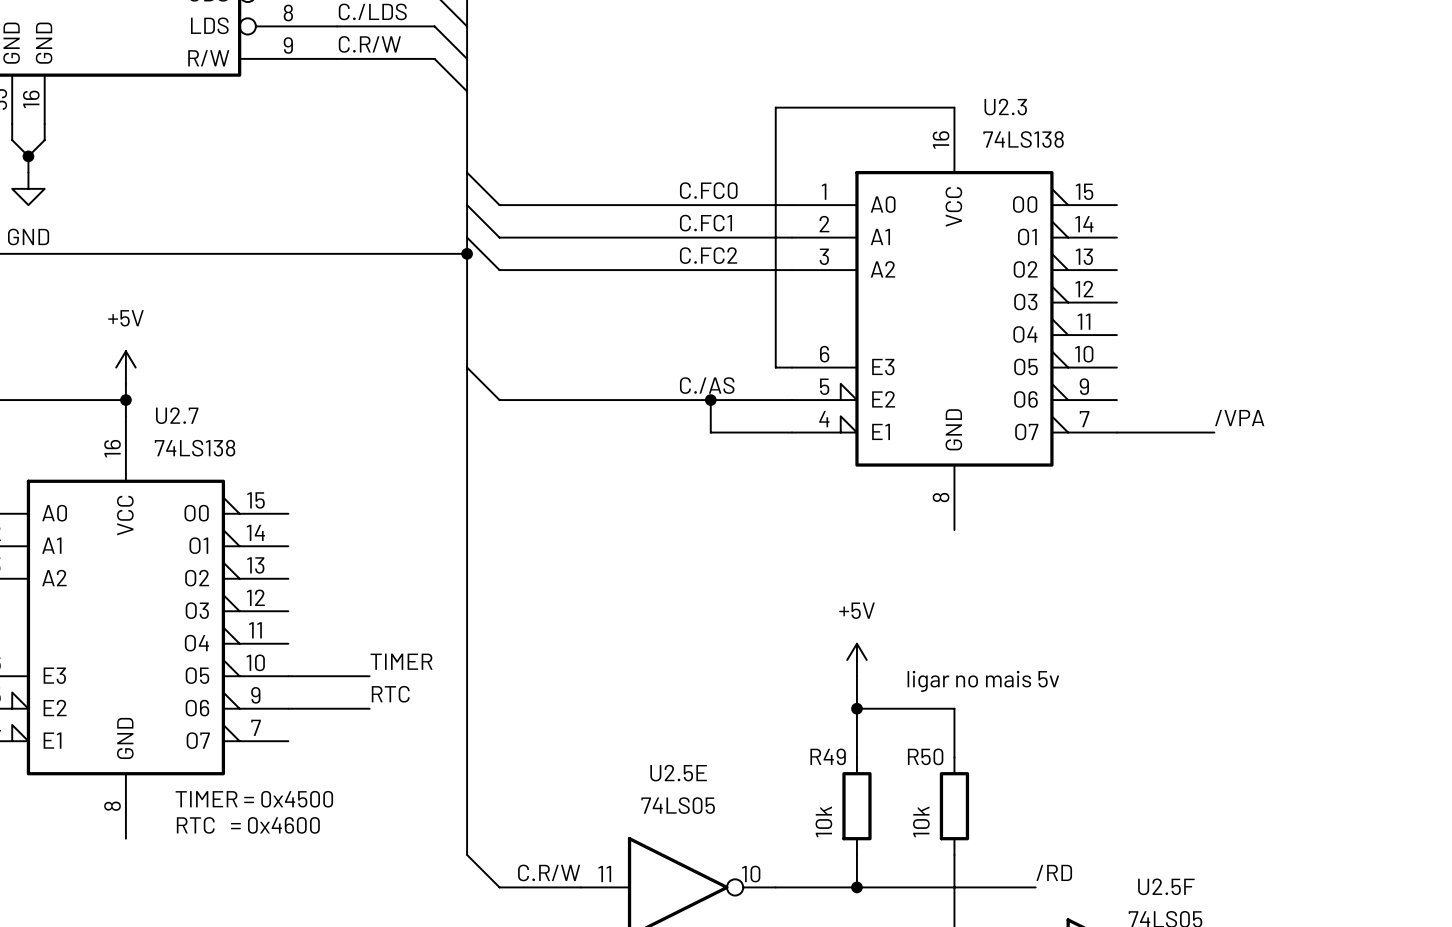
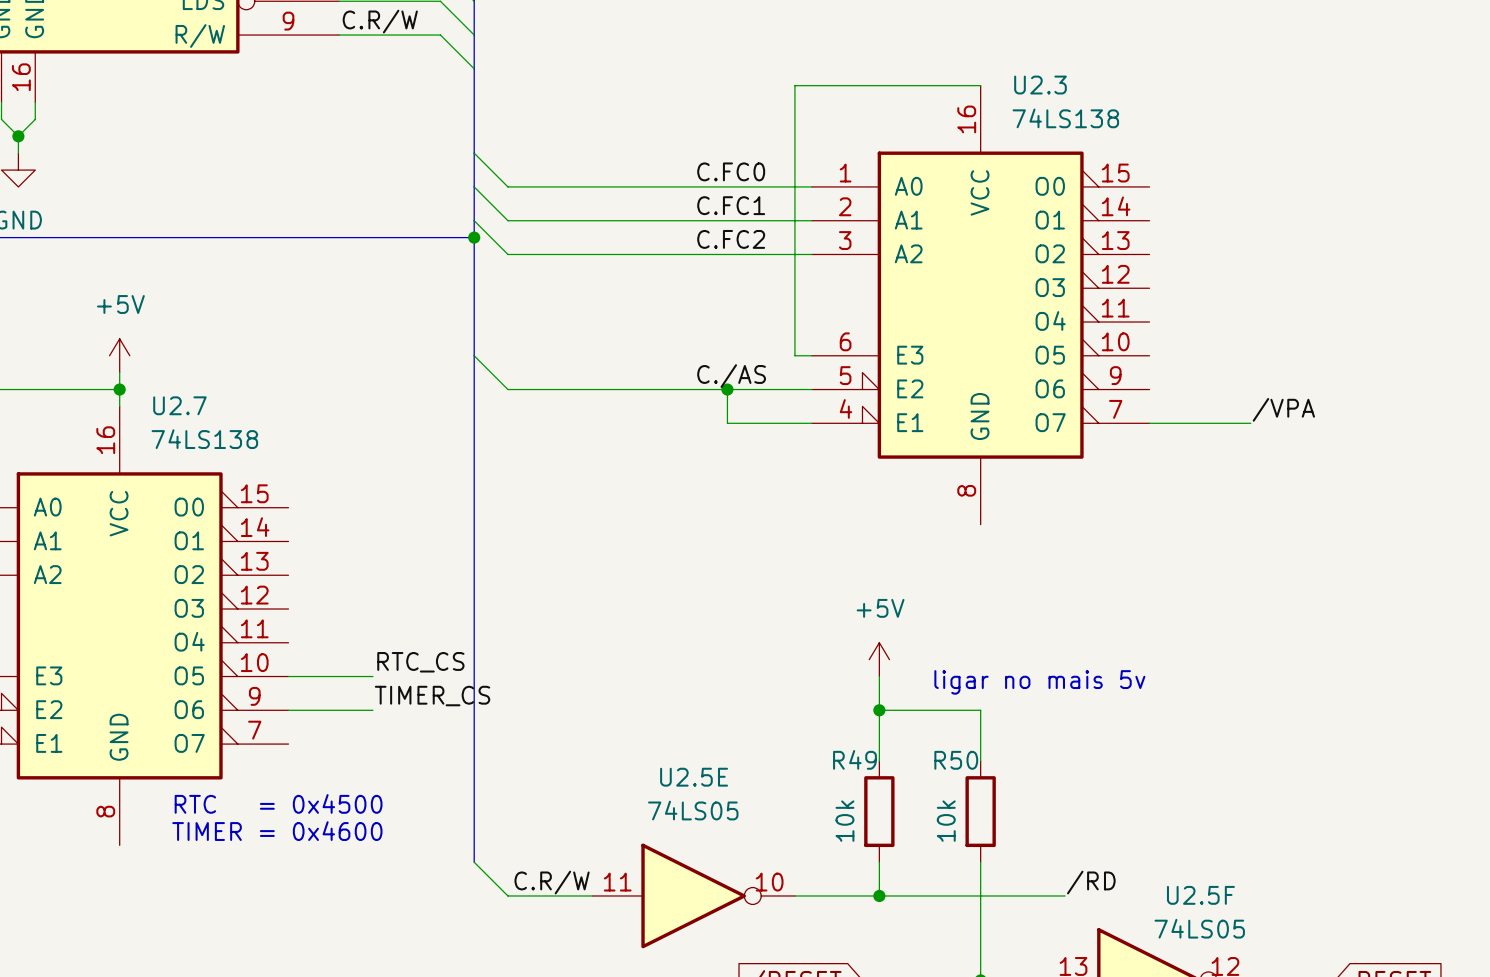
label: TIMER (401, 661) -> RTC_CS (420, 662)
label: RTC (390, 694) -> TIMER_CS (432, 696)
text: TIMER = 0x4500 (254, 799) -> RTC = 0x4500 (278, 803)
text: RTC = 0x4600 (248, 825) -> TIMER = 0x4600 (277, 831)

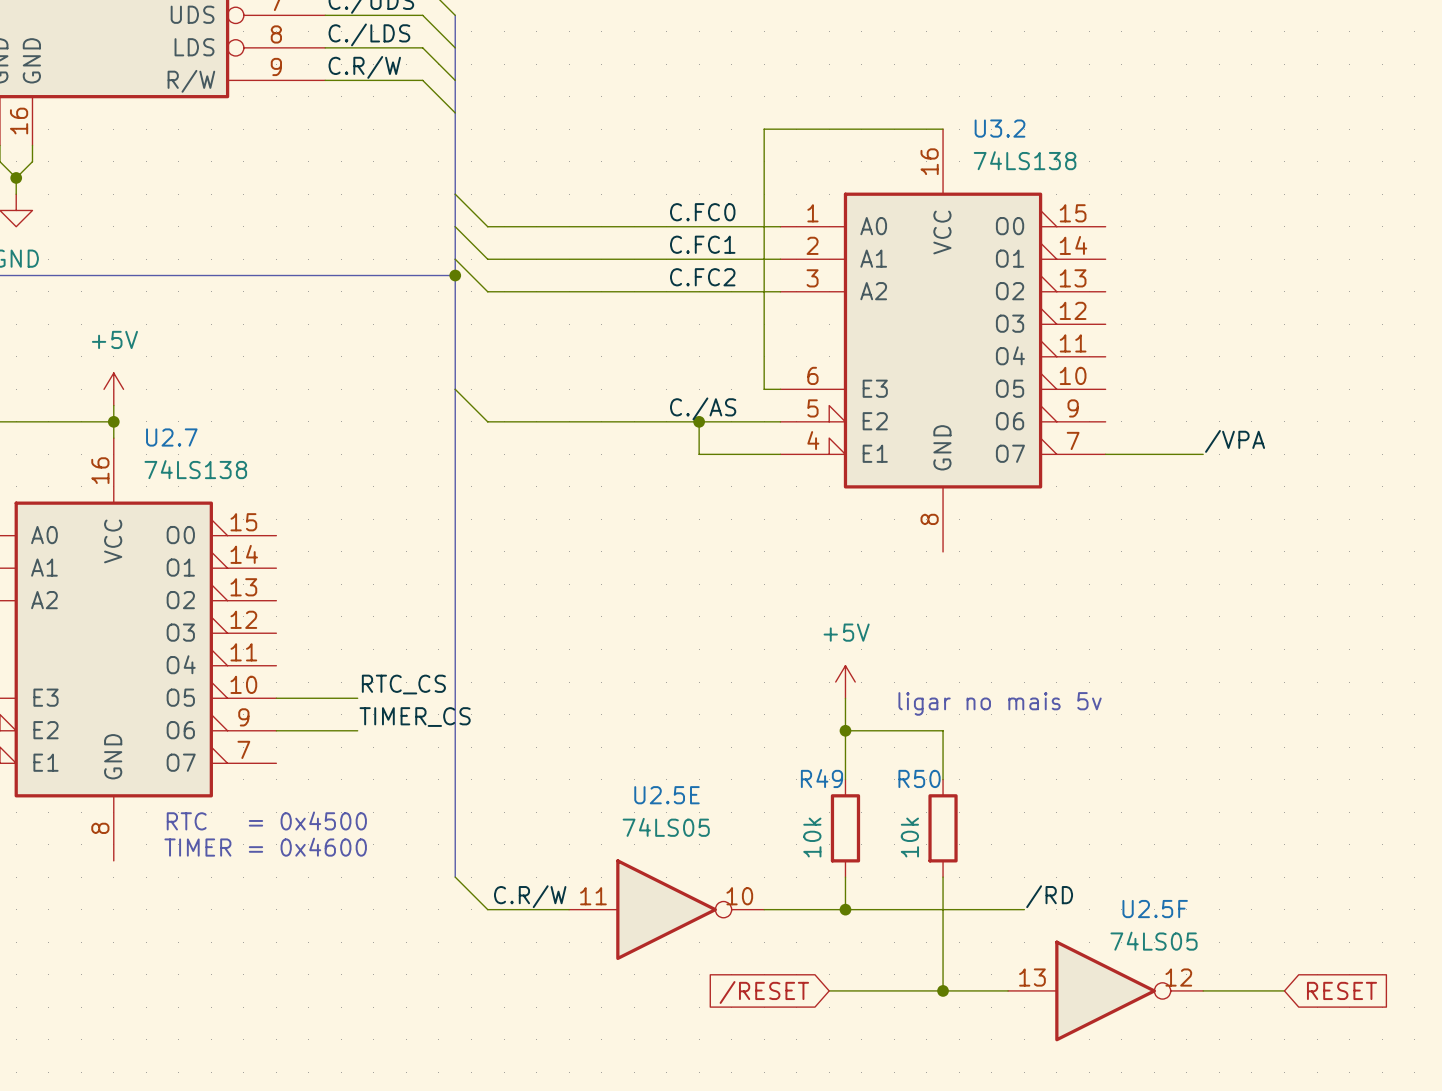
U2.3 name: U2.3 (1040, 85) -> U3.2 (1000, 128)

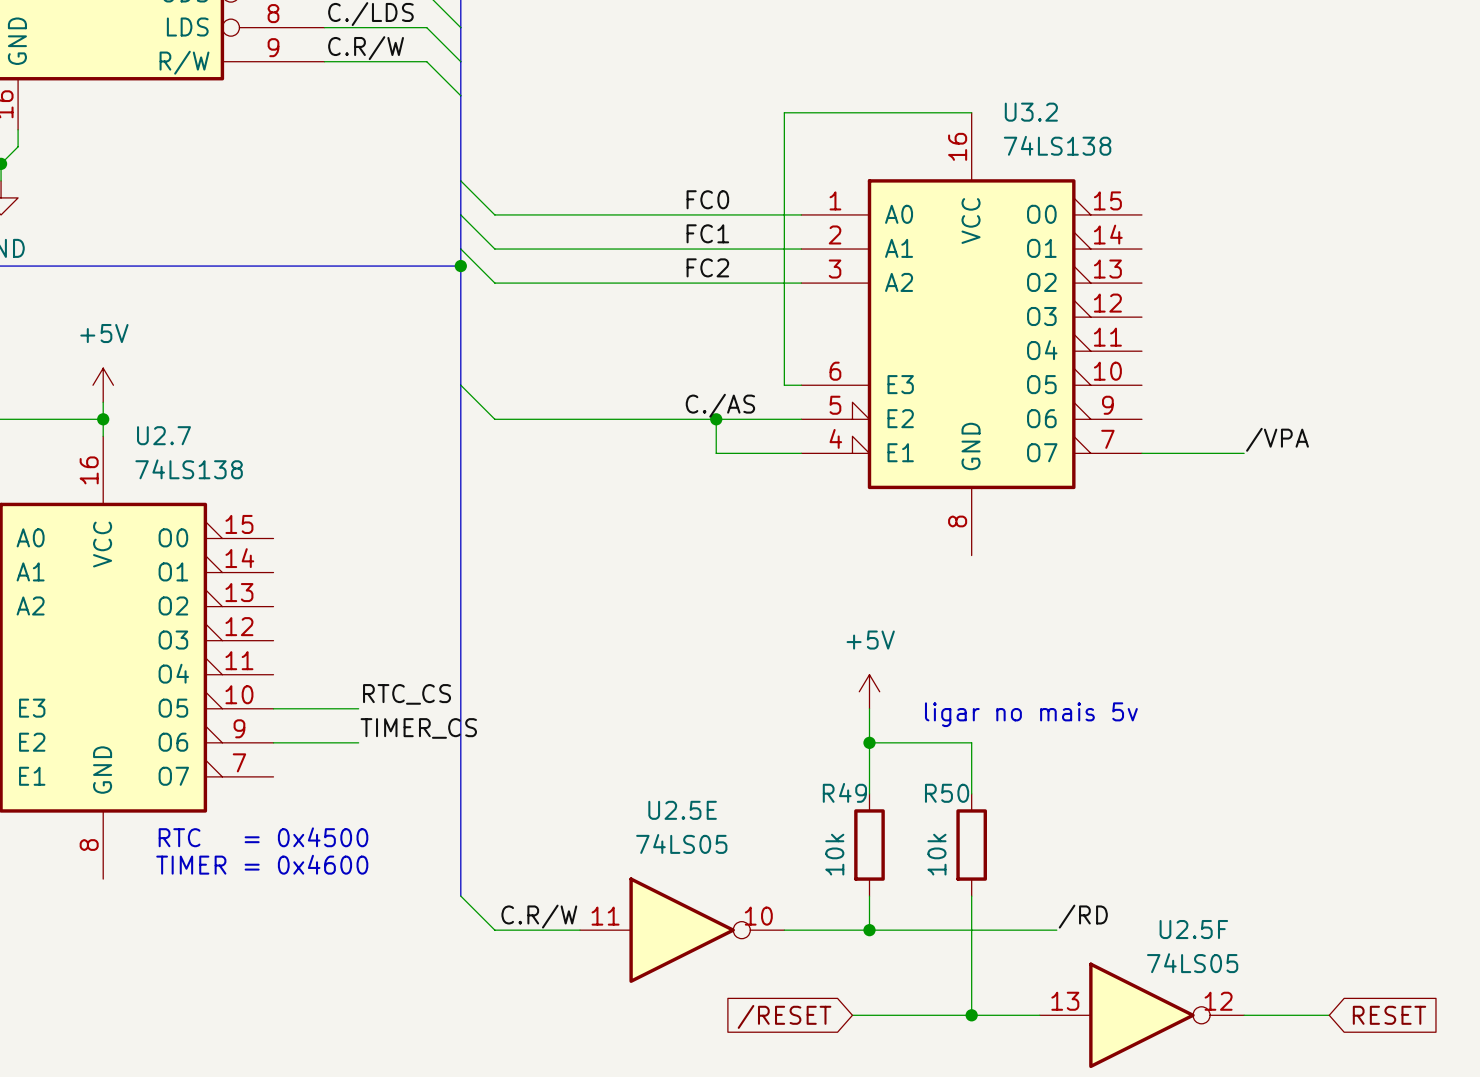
label: C.FC0 (702, 212) -> FC0 (707, 199)
label: C.FC1 (702, 244) -> FC1 (707, 233)
label: C.FC2 (702, 277) -> FC2 (707, 267)

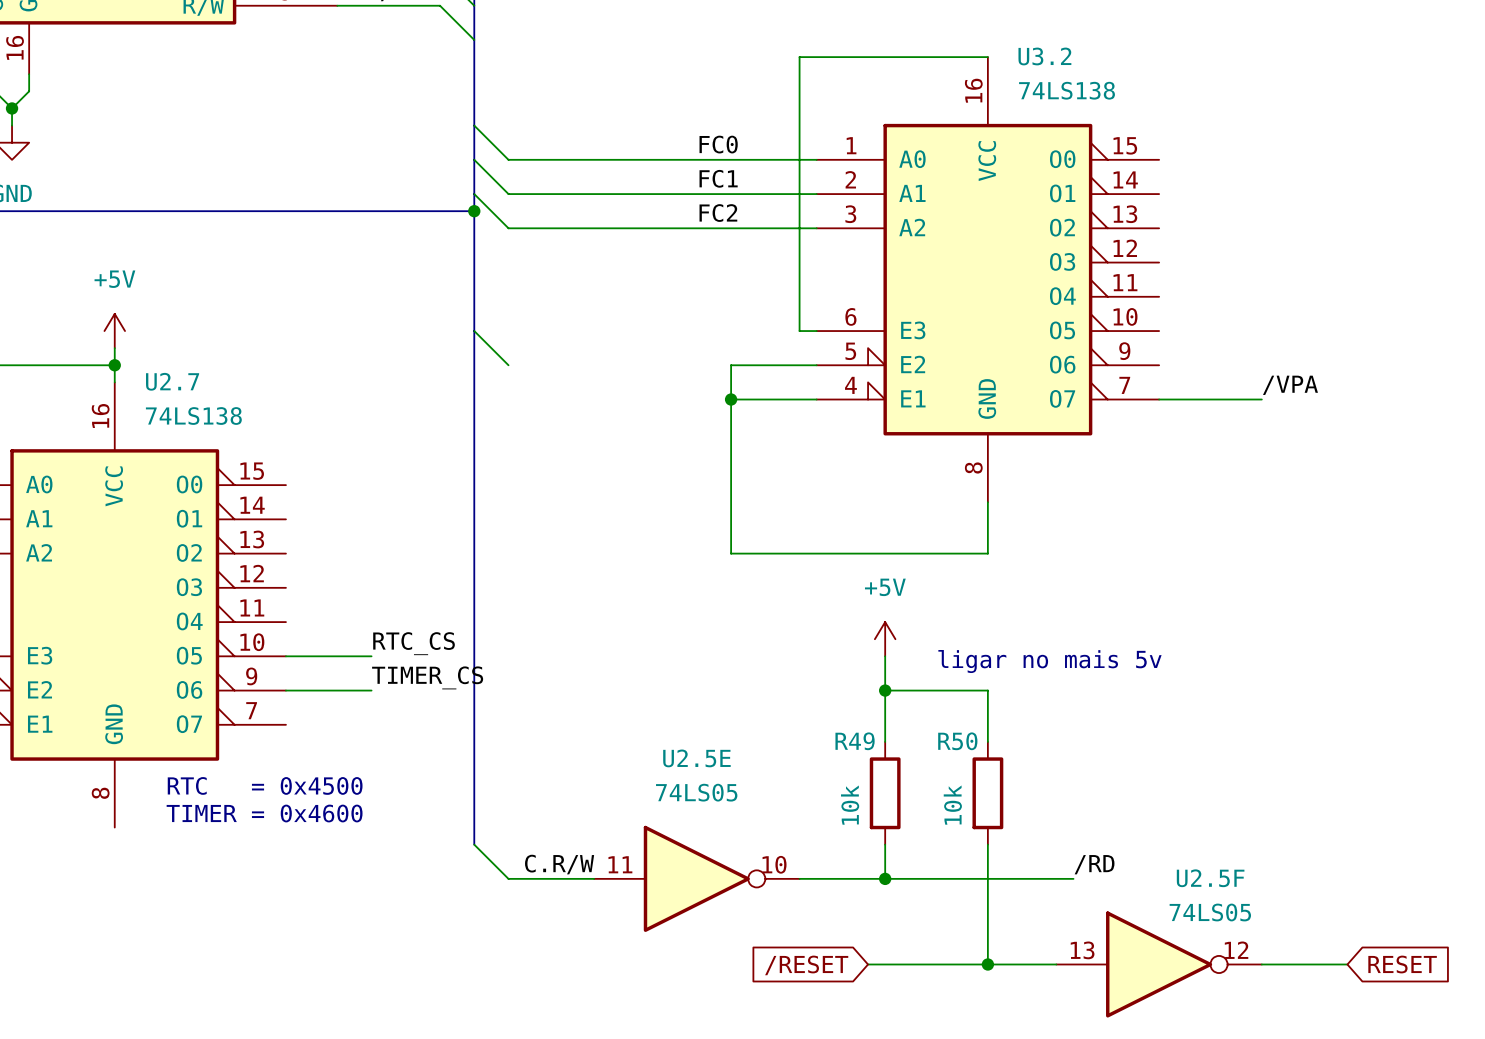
label: C./AS (720, 405) -> none
wire: (494, 419) (716, 419) -> none
junction position: (716, 419) -> (731, 399)
wire: none -> (731, 399) (731, 553) (987, 553) (987, 502)

